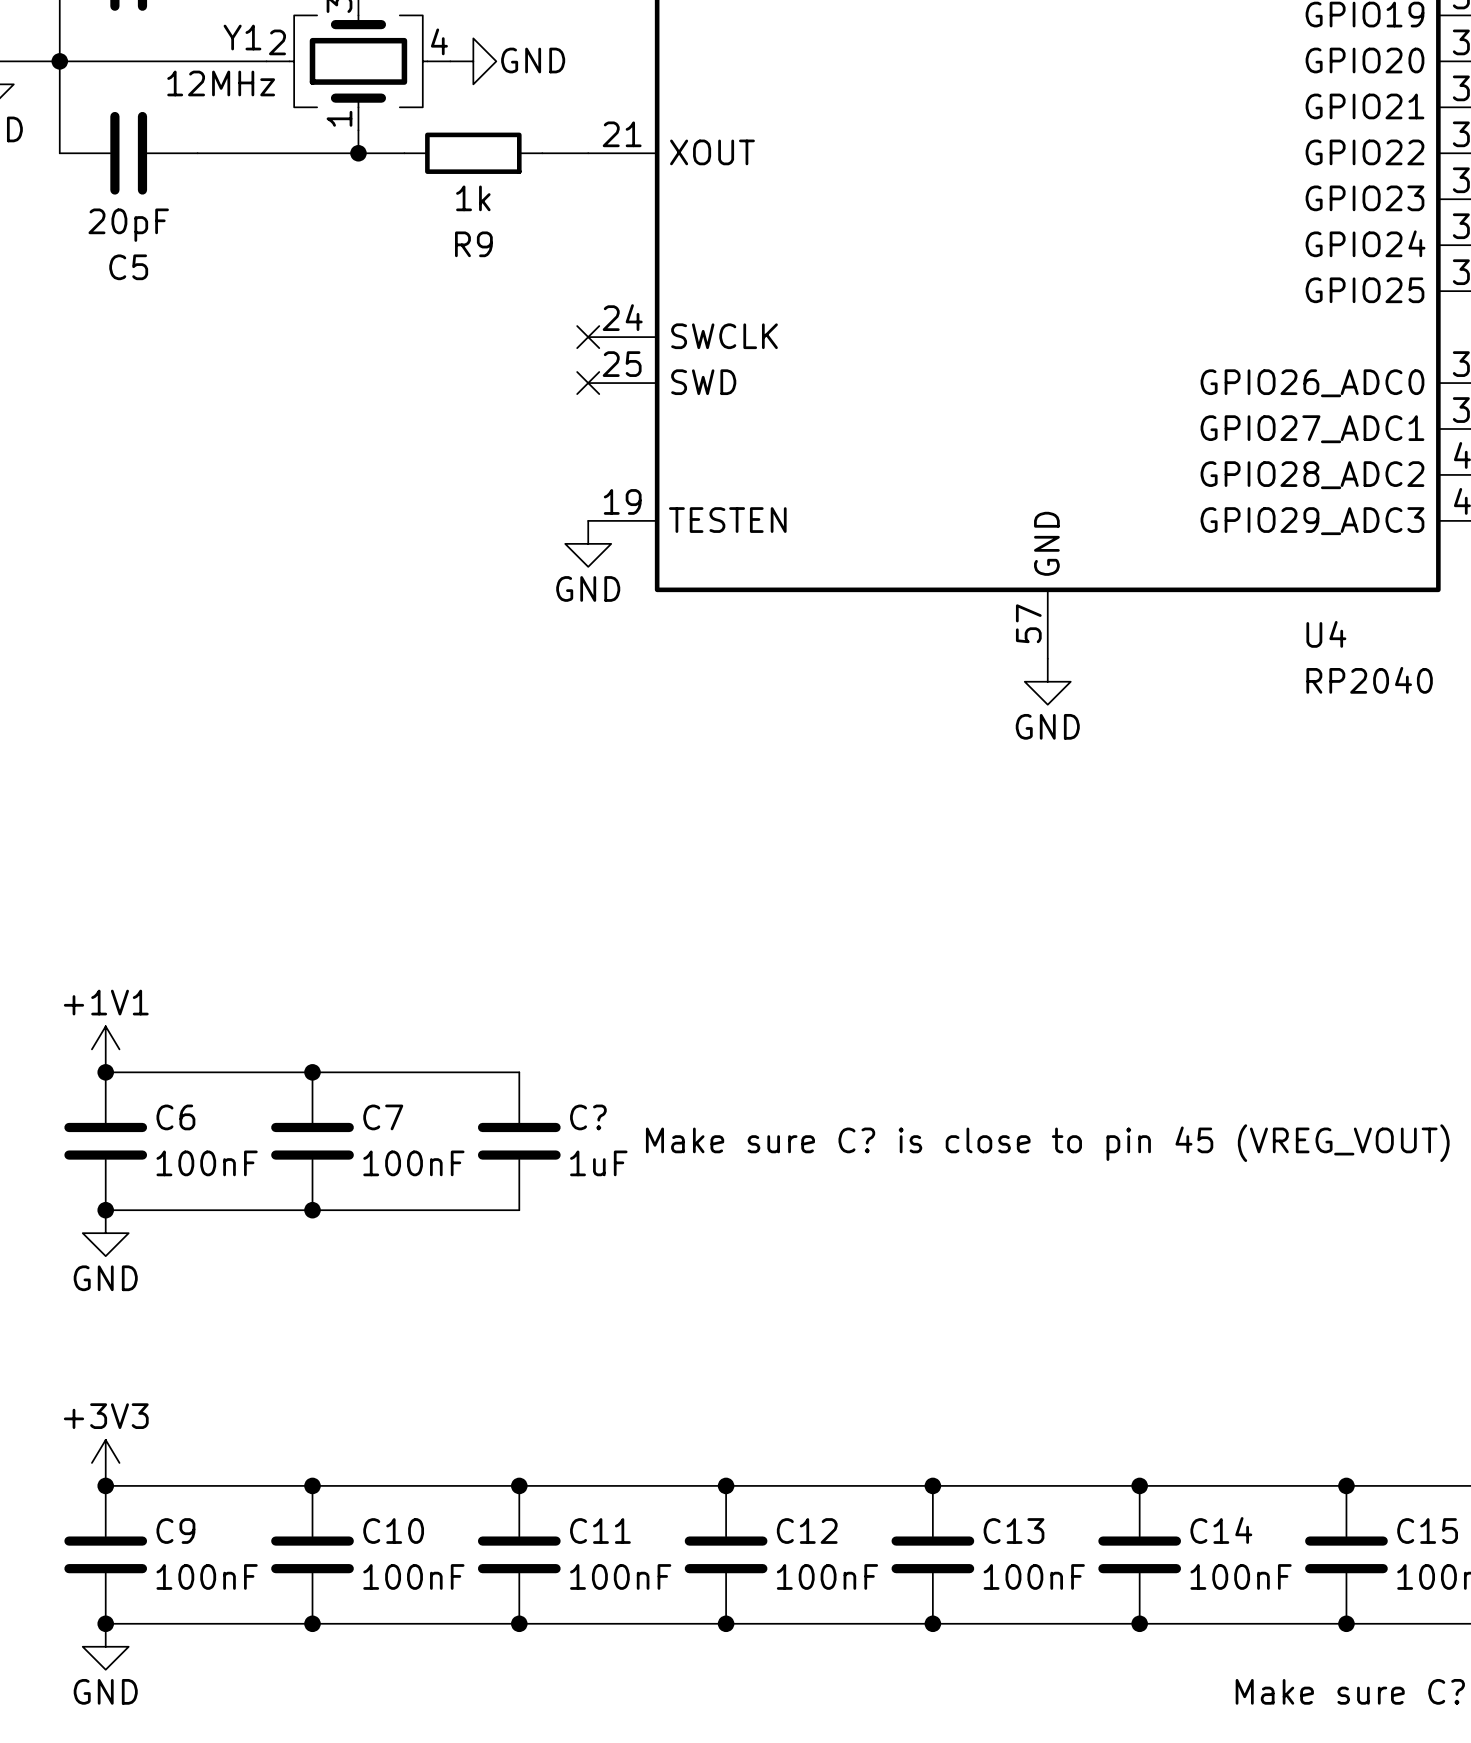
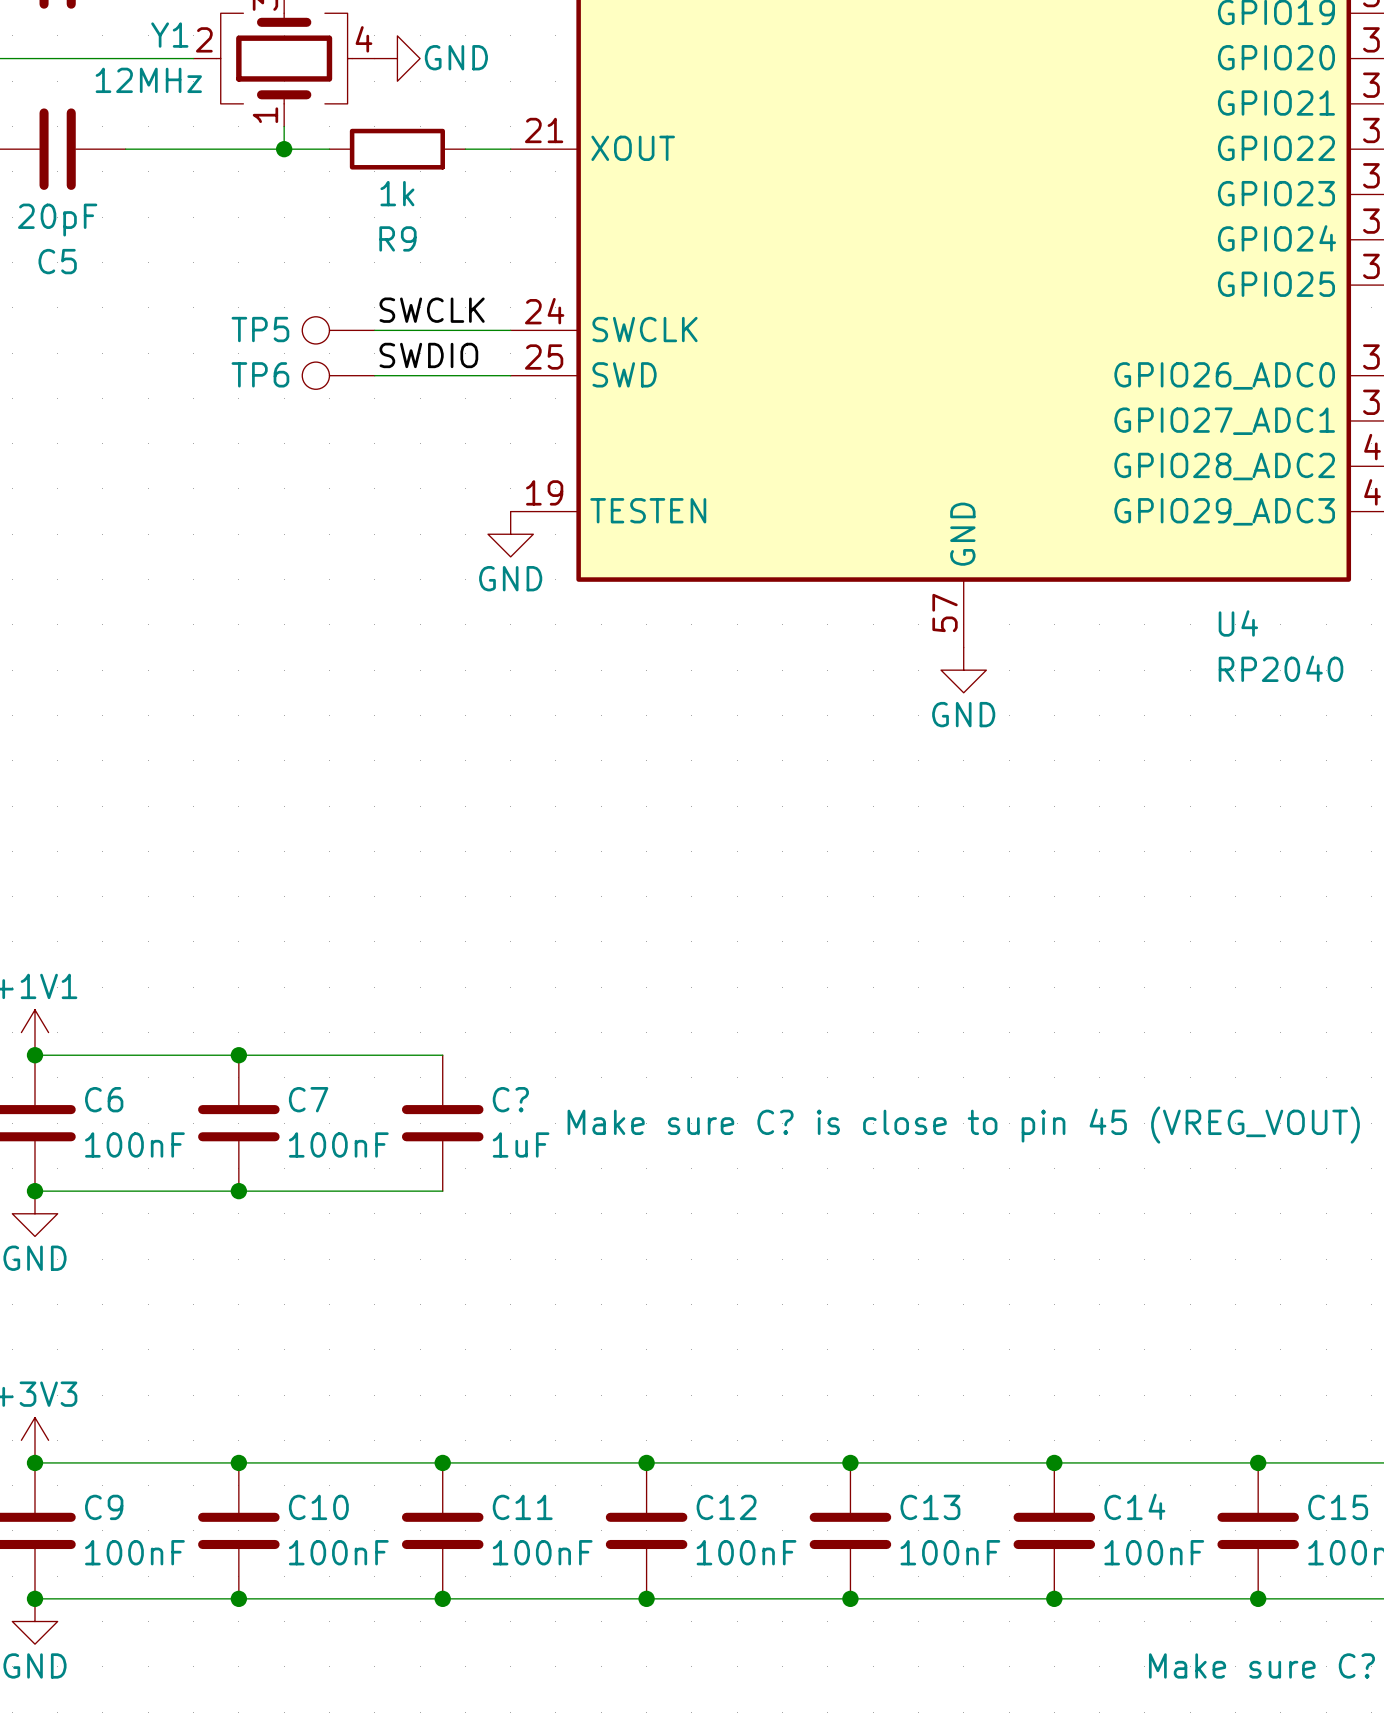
label: none -> SWCLK (432, 310)
TP5: none -> (338, 330)
wire: none -> (374, 330) (510, 330)
no-connect mark: (588, 337) -> none
label: none -> SWDIO (428, 355)
TP6: none -> (338, 375)
wire: none -> (374, 375) (510, 375)
no-connect mark: (588, 383) -> none

